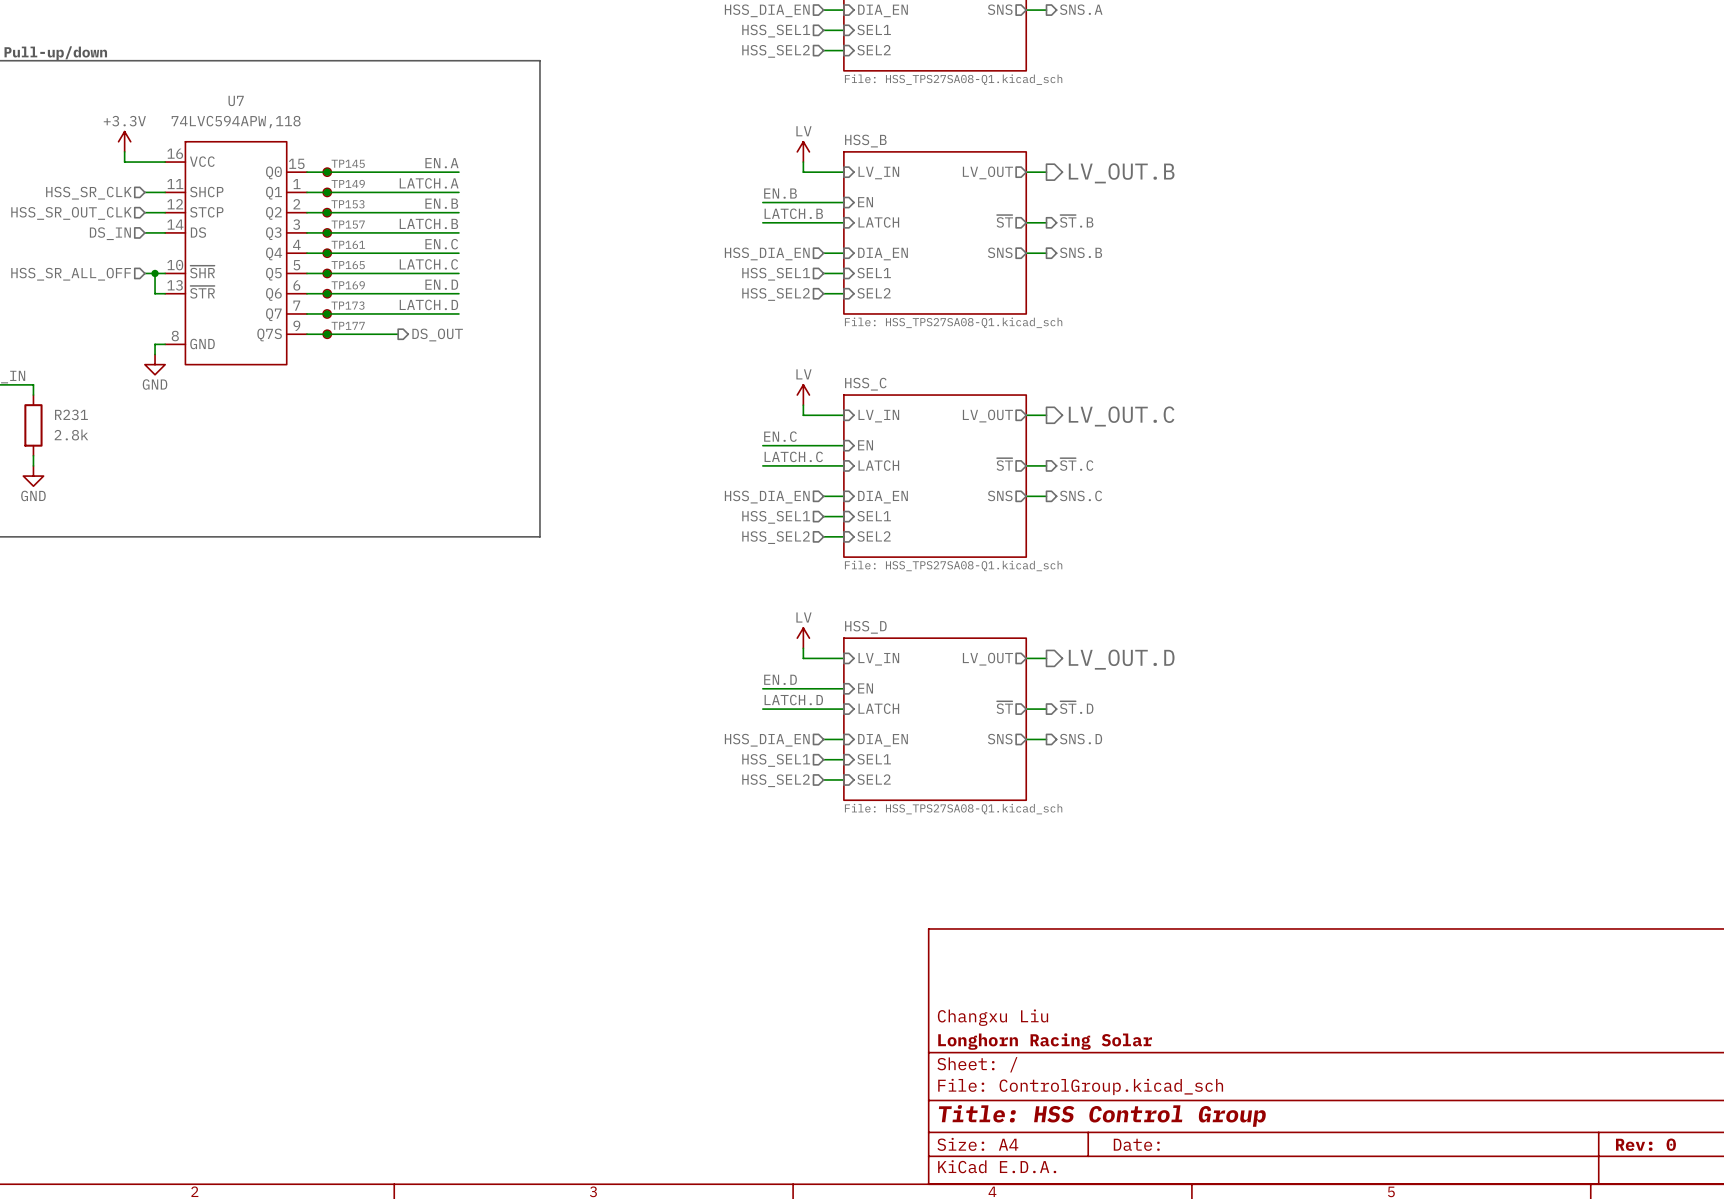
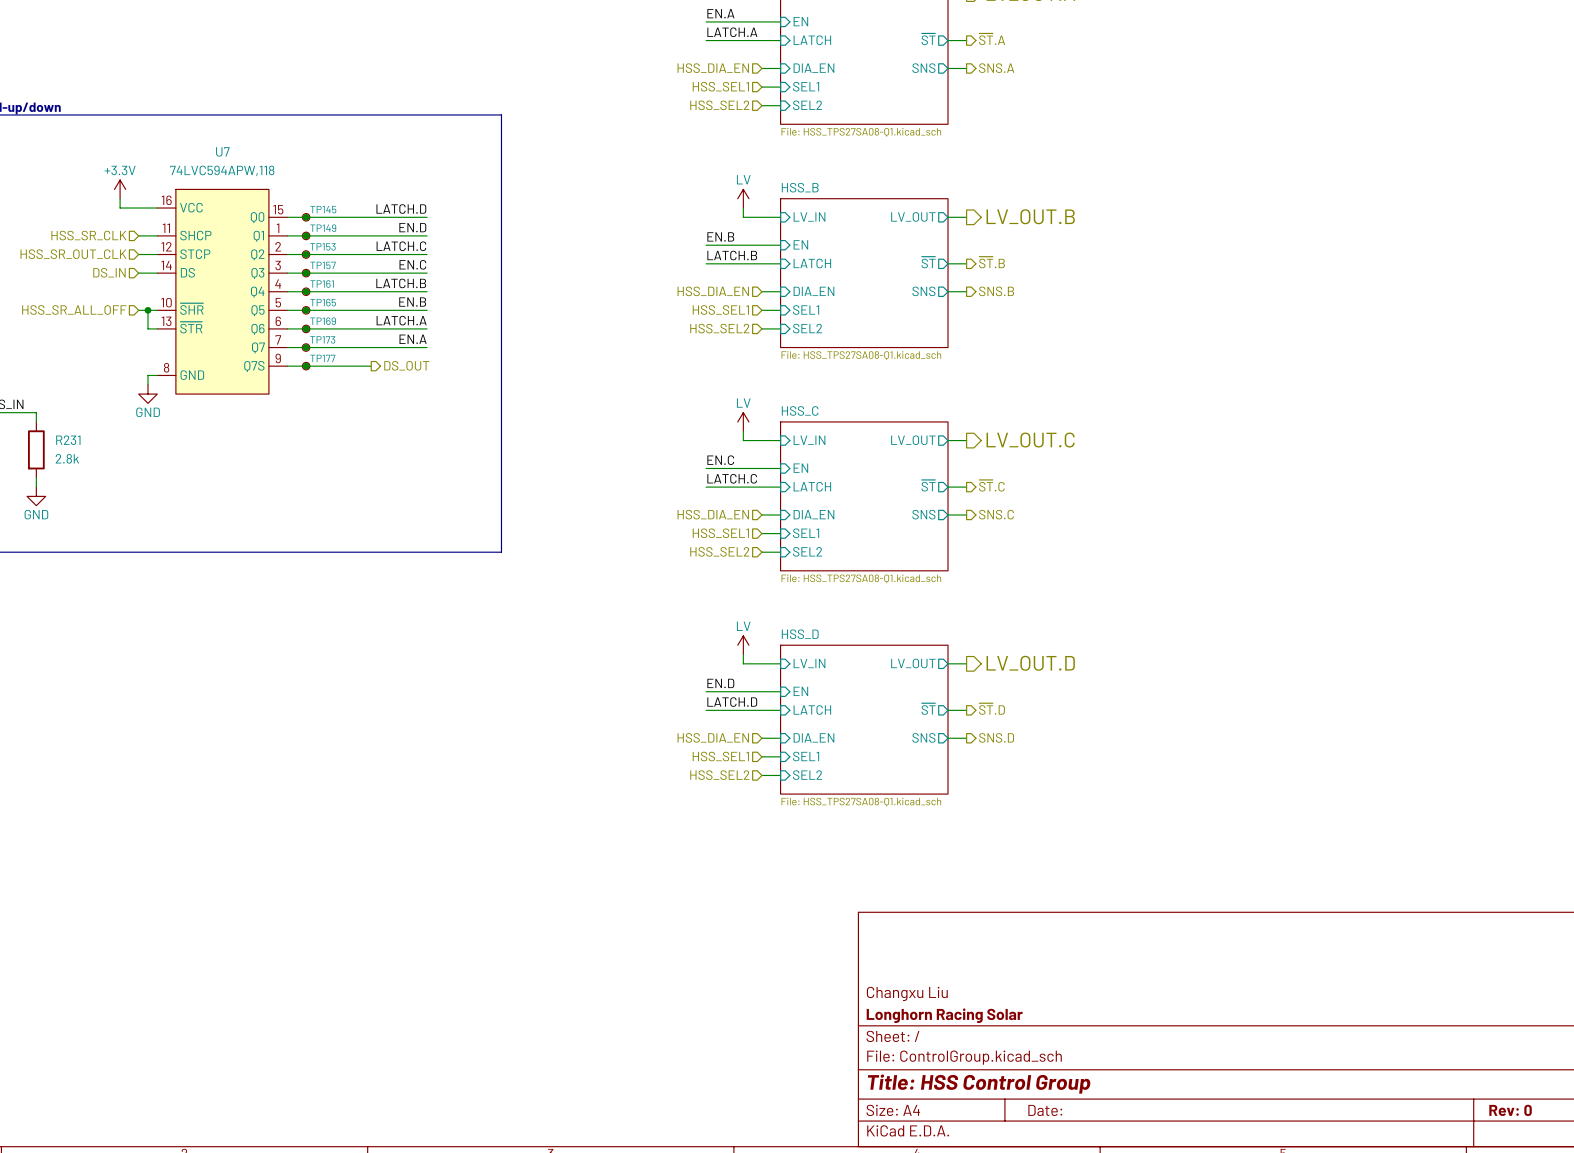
label: EN.A (441, 163) -> LATCH.D (401, 209)
label: LATCH.A (429, 183) -> EN.D (412, 227)
label: EN.B (441, 203) -> LATCH.C (401, 246)
label: LATCH.B (428, 223) -> EN.C (412, 264)
label: EN.C (441, 244) -> LATCH.B (401, 283)
label: LATCH.C (428, 264) -> EN.B (412, 302)
label: EN.D (441, 284) -> LATCH.A (401, 320)
label: LATCH.D (428, 304) -> EN.A (413, 339)

